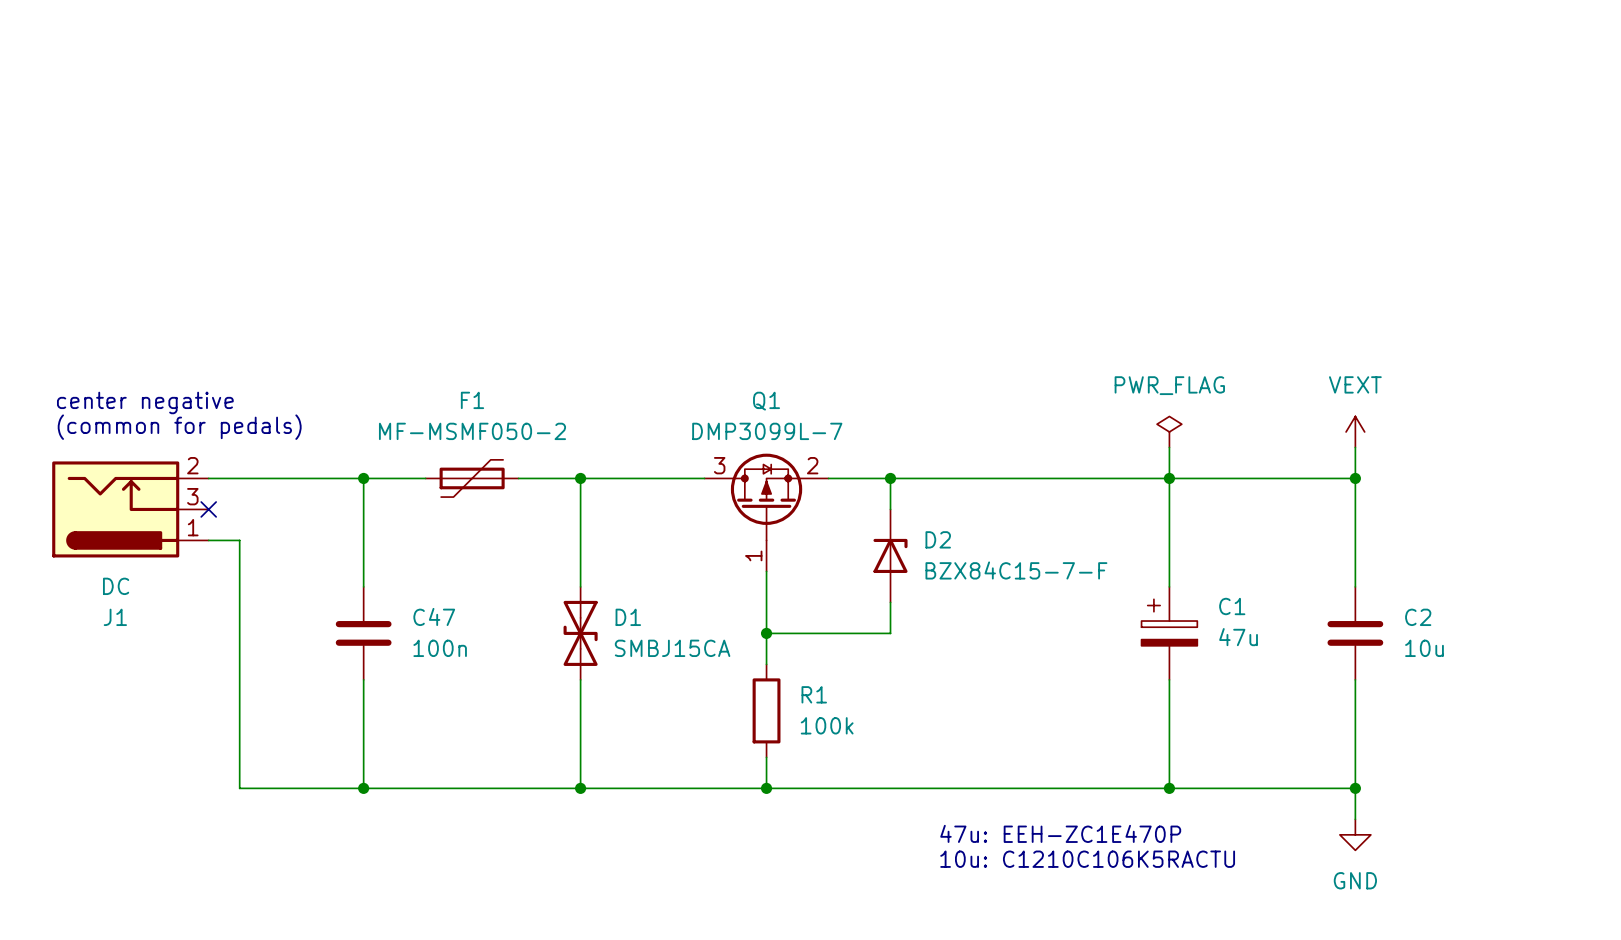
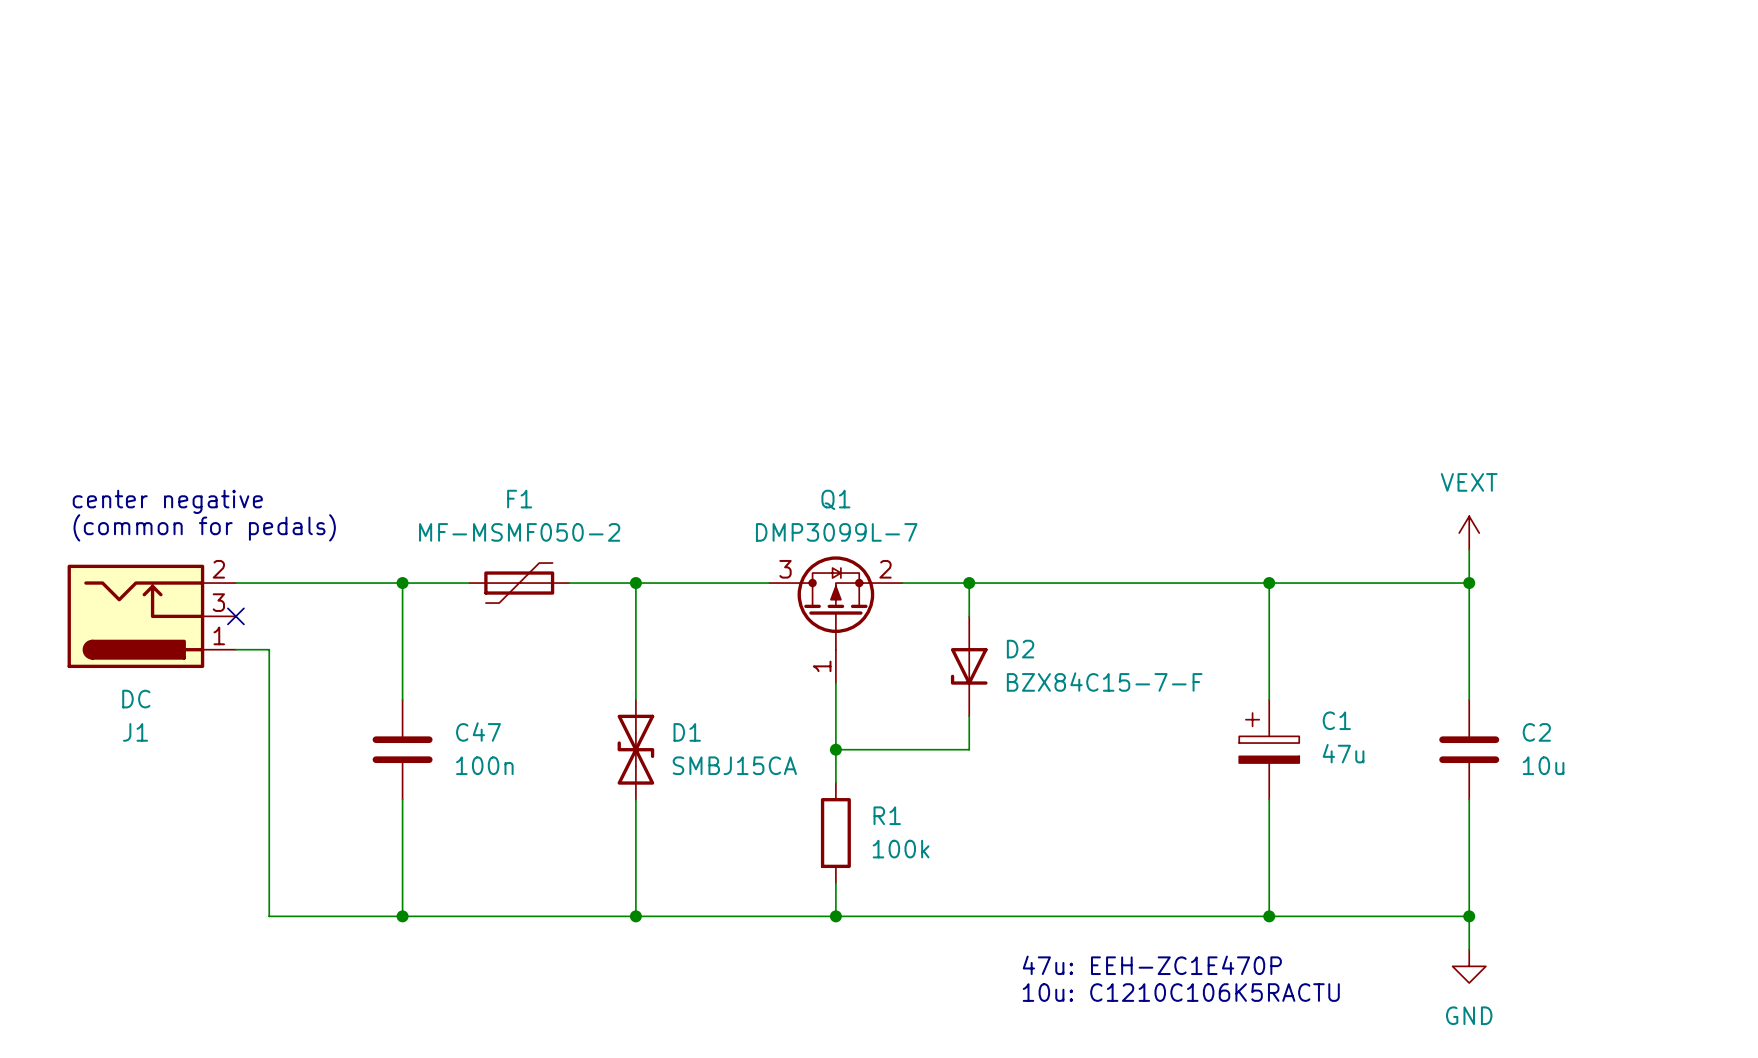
power symbol: PWR_FLAG (1169, 431) -> none
wire: (1169, 447) (1169, 478) -> none
D2 rotation: 0° (890, 555) -> 180° (969, 666)

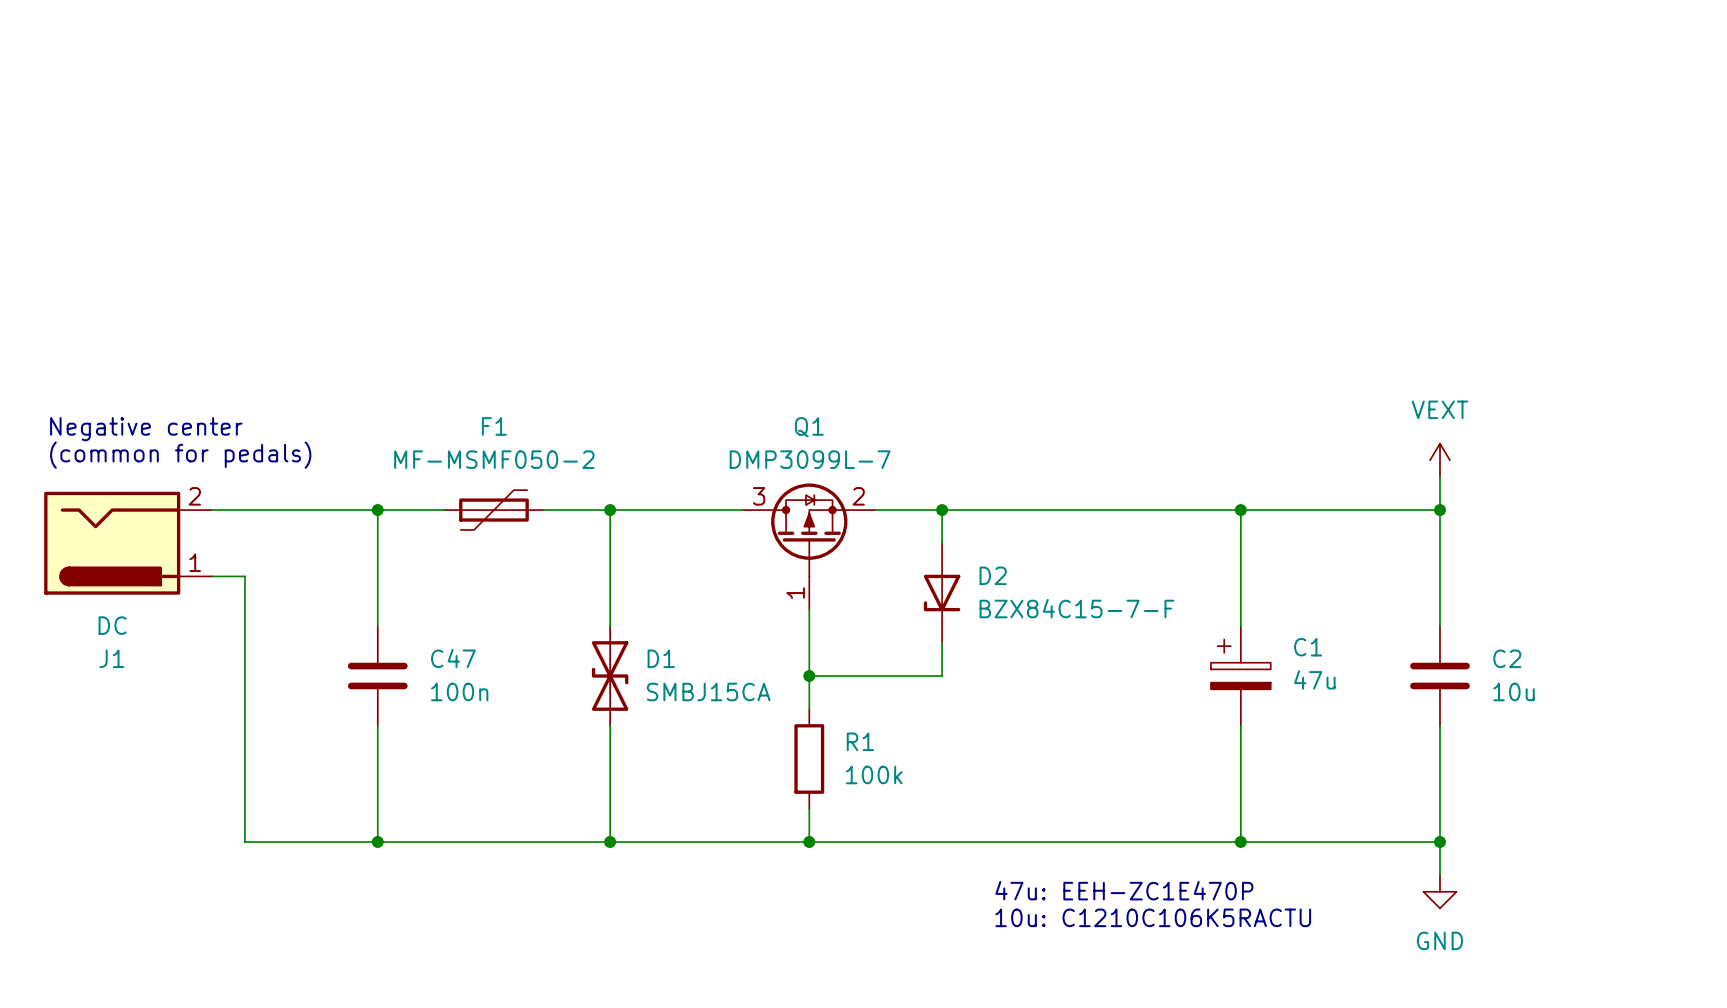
text: center negative (167, 501) -> Negative center (146, 429)
J1 symbol: [67, 564, 236, 669] -> [44, 491, 212, 595]
no-connect mark: (235, 616) -> none

